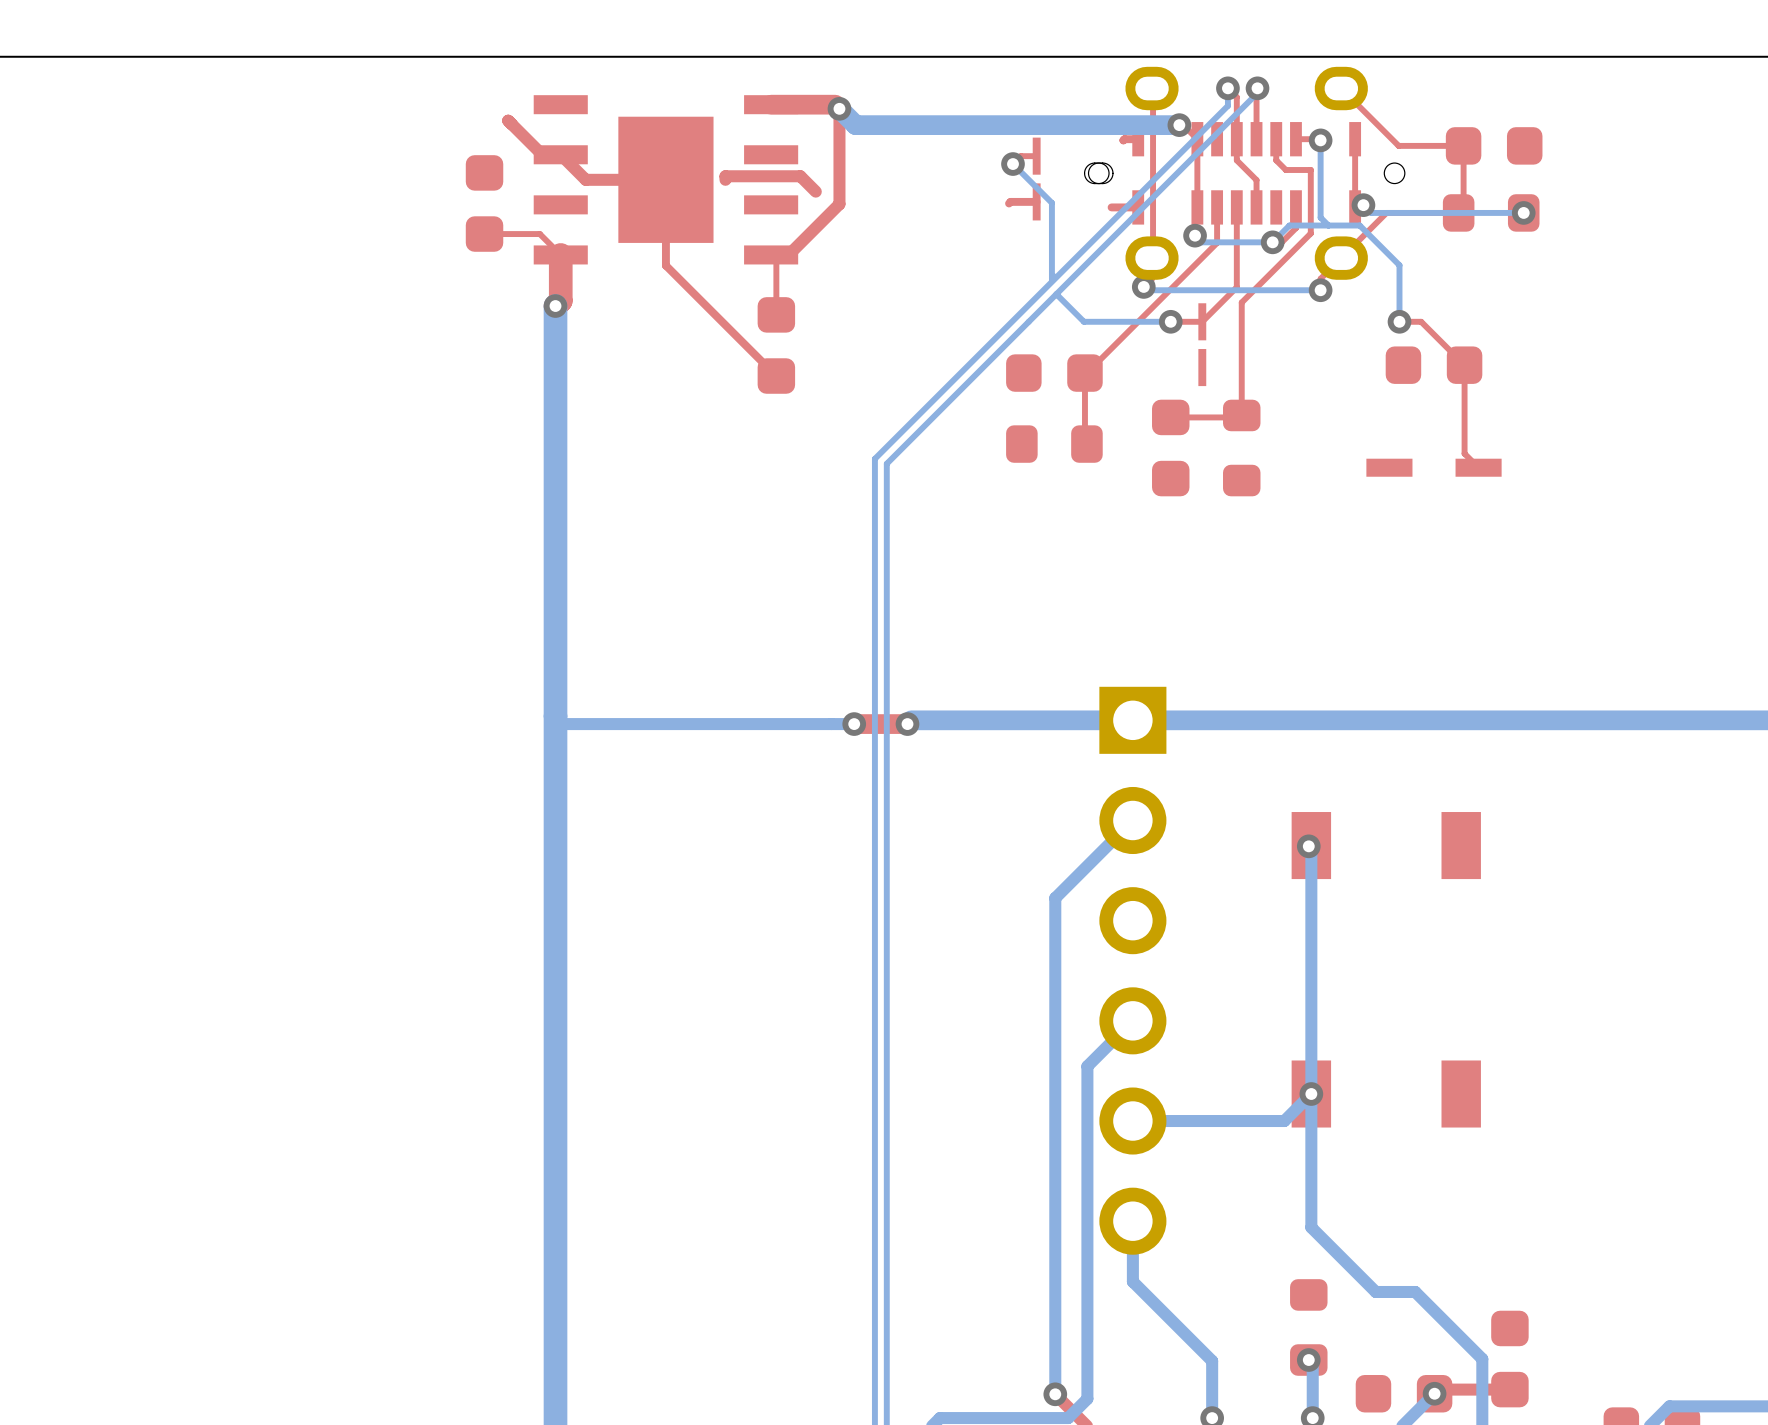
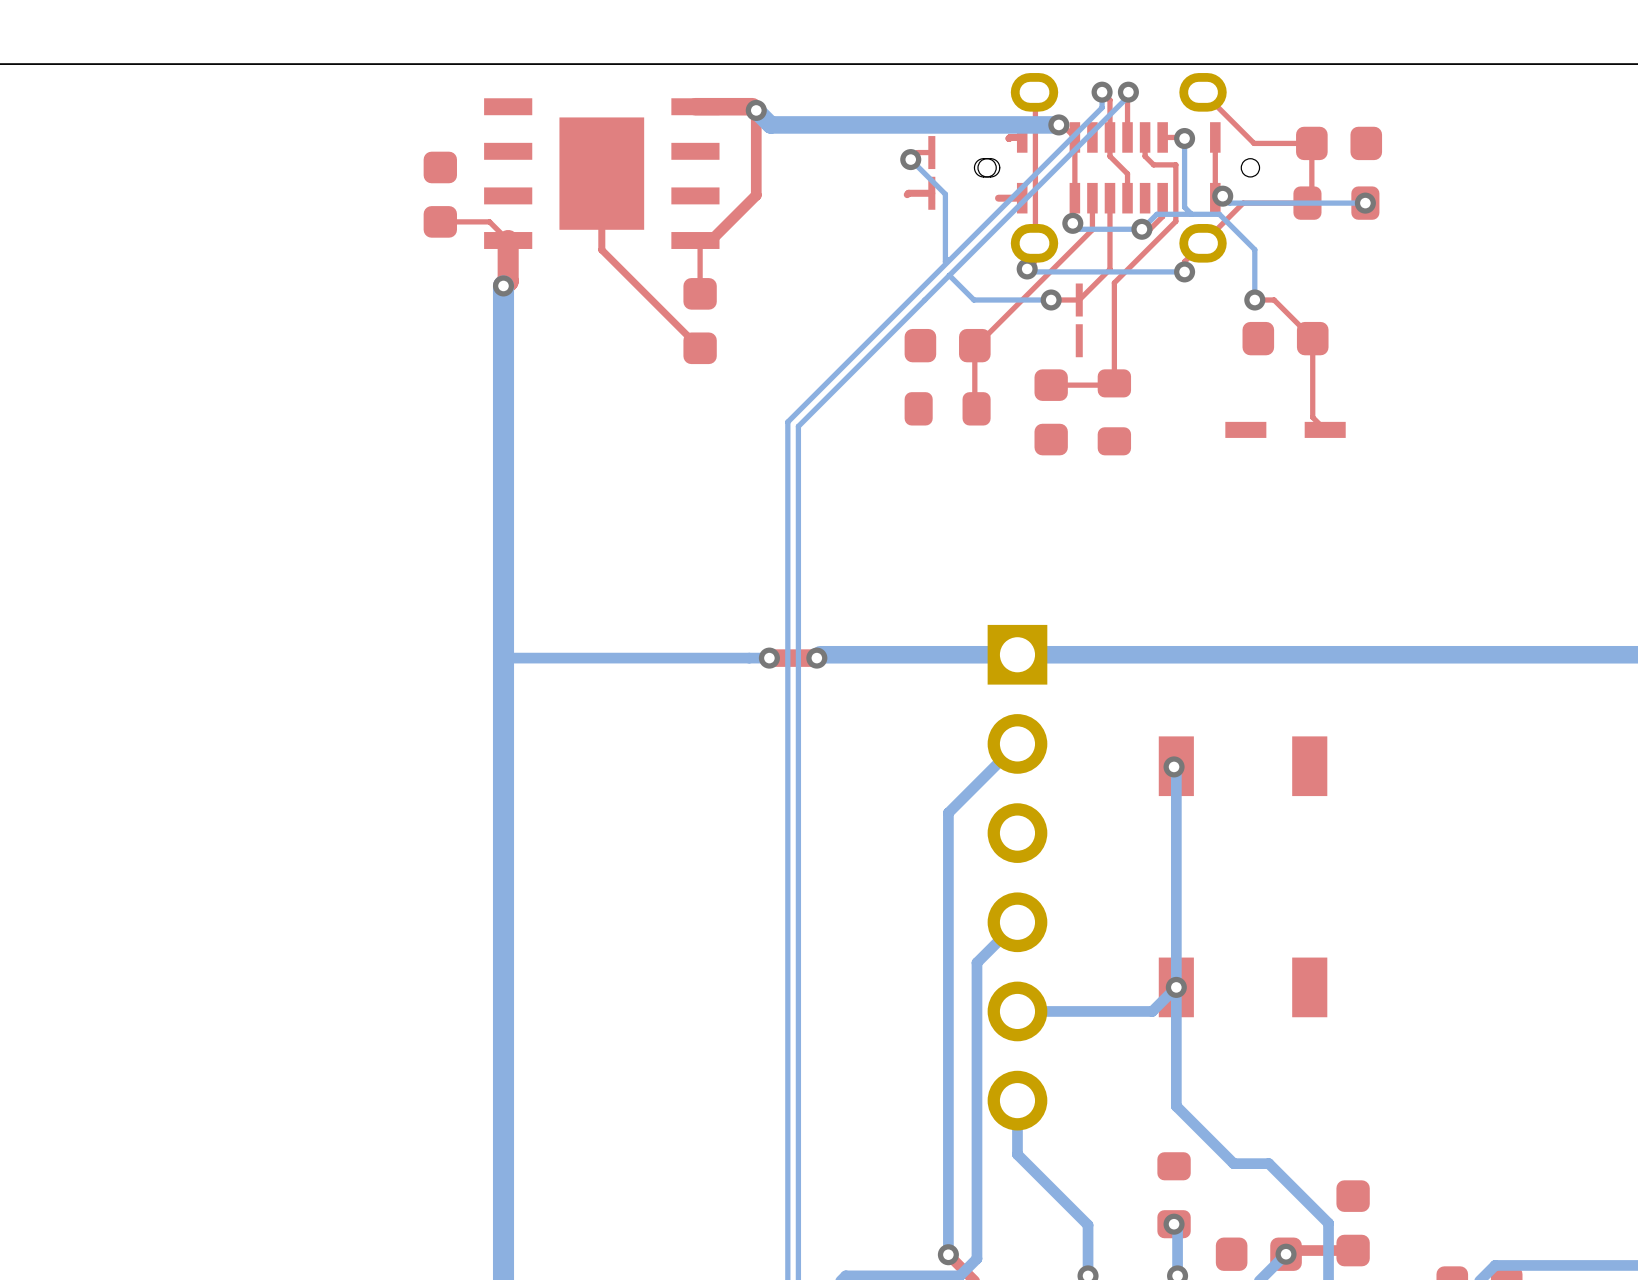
top track: (508, 120) (542, 154) (560, 154) (585, 179) (665, 179) -> none
top track: (725, 179) (725, 176) (800, 176) (815, 191) -> none

